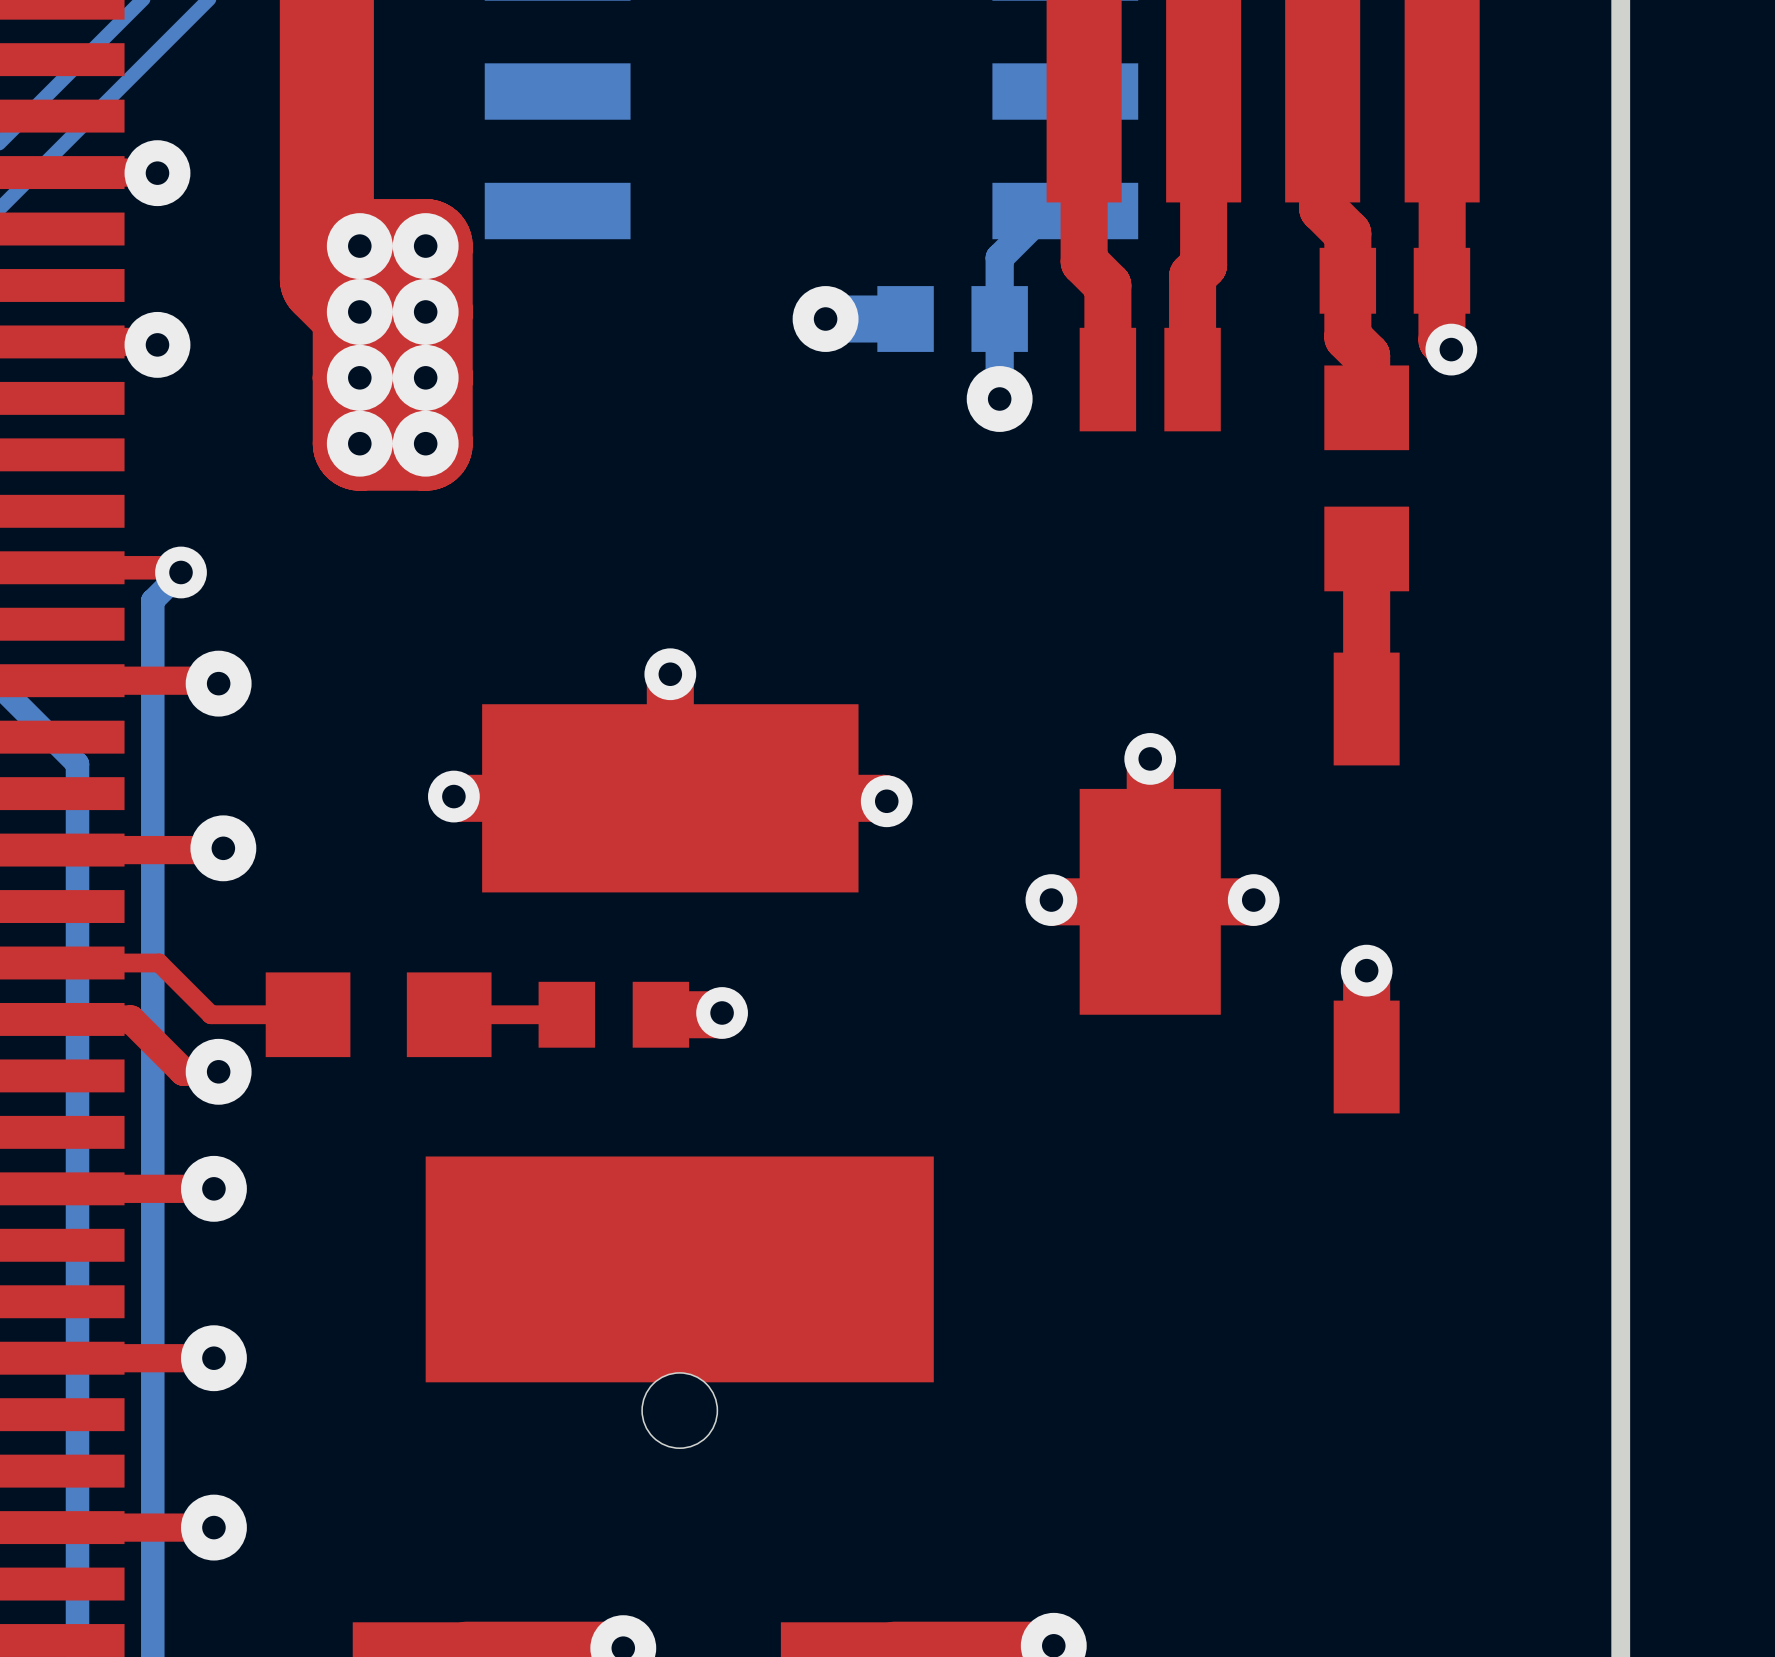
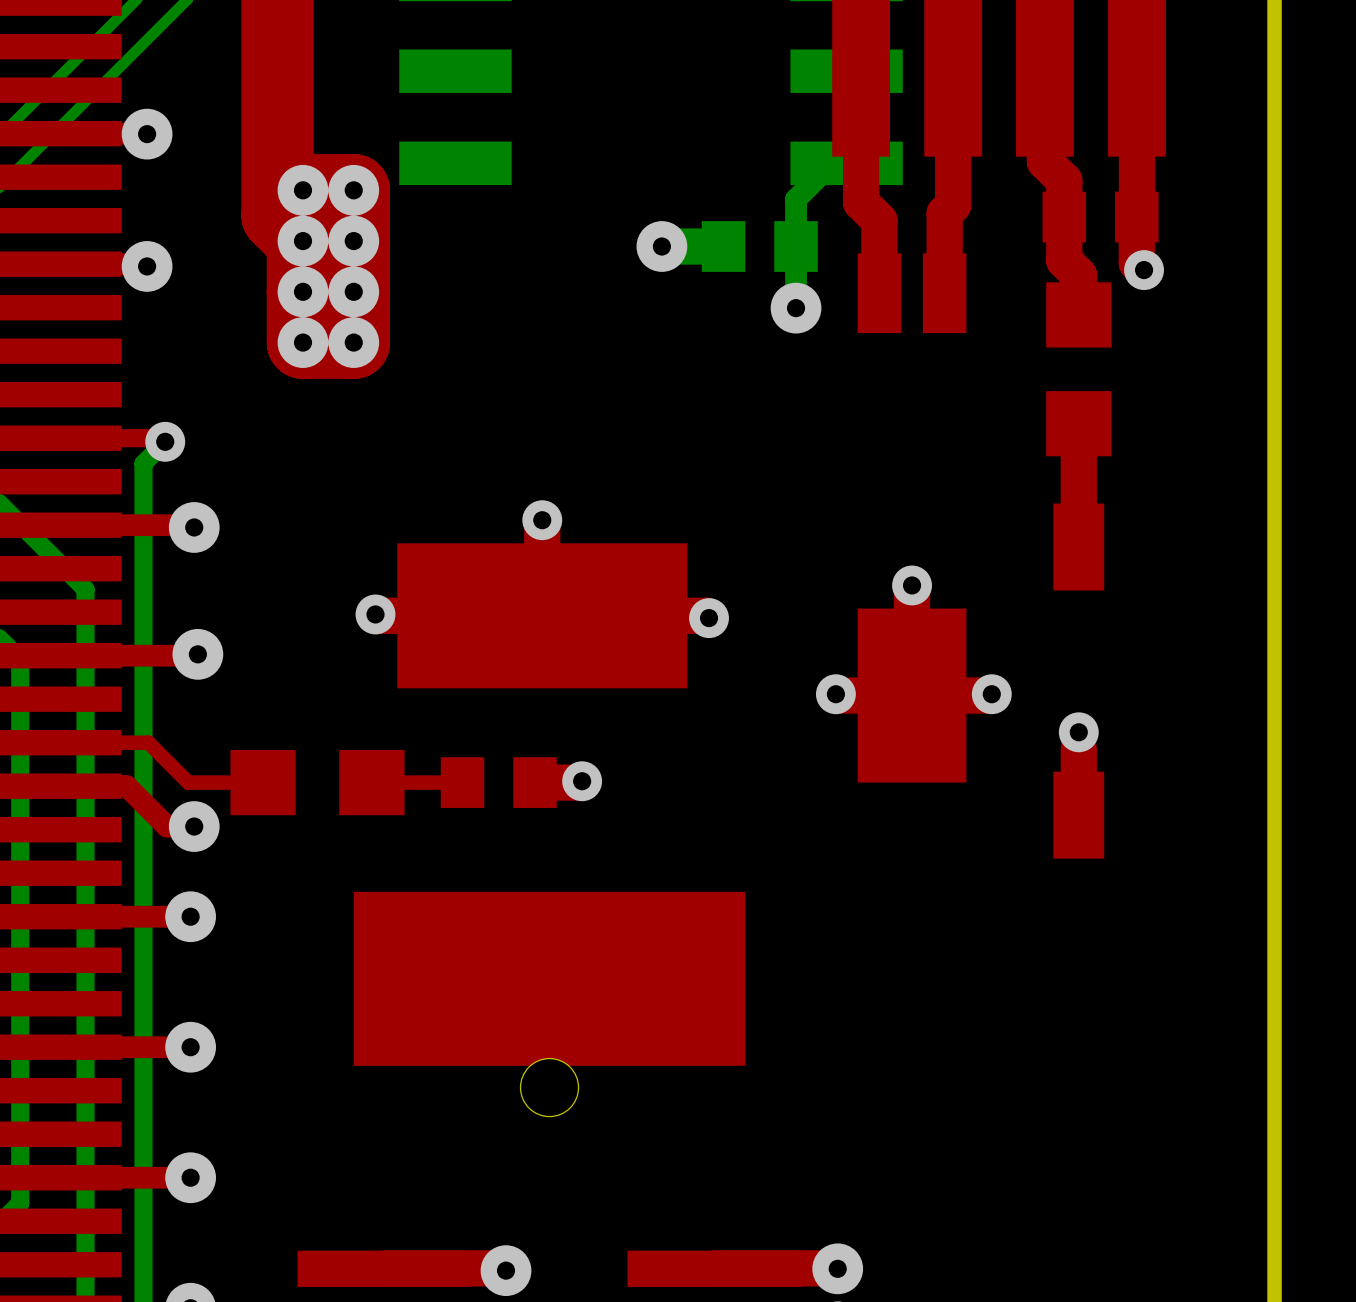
via position: (1366, 970) -> (1078, 732)

